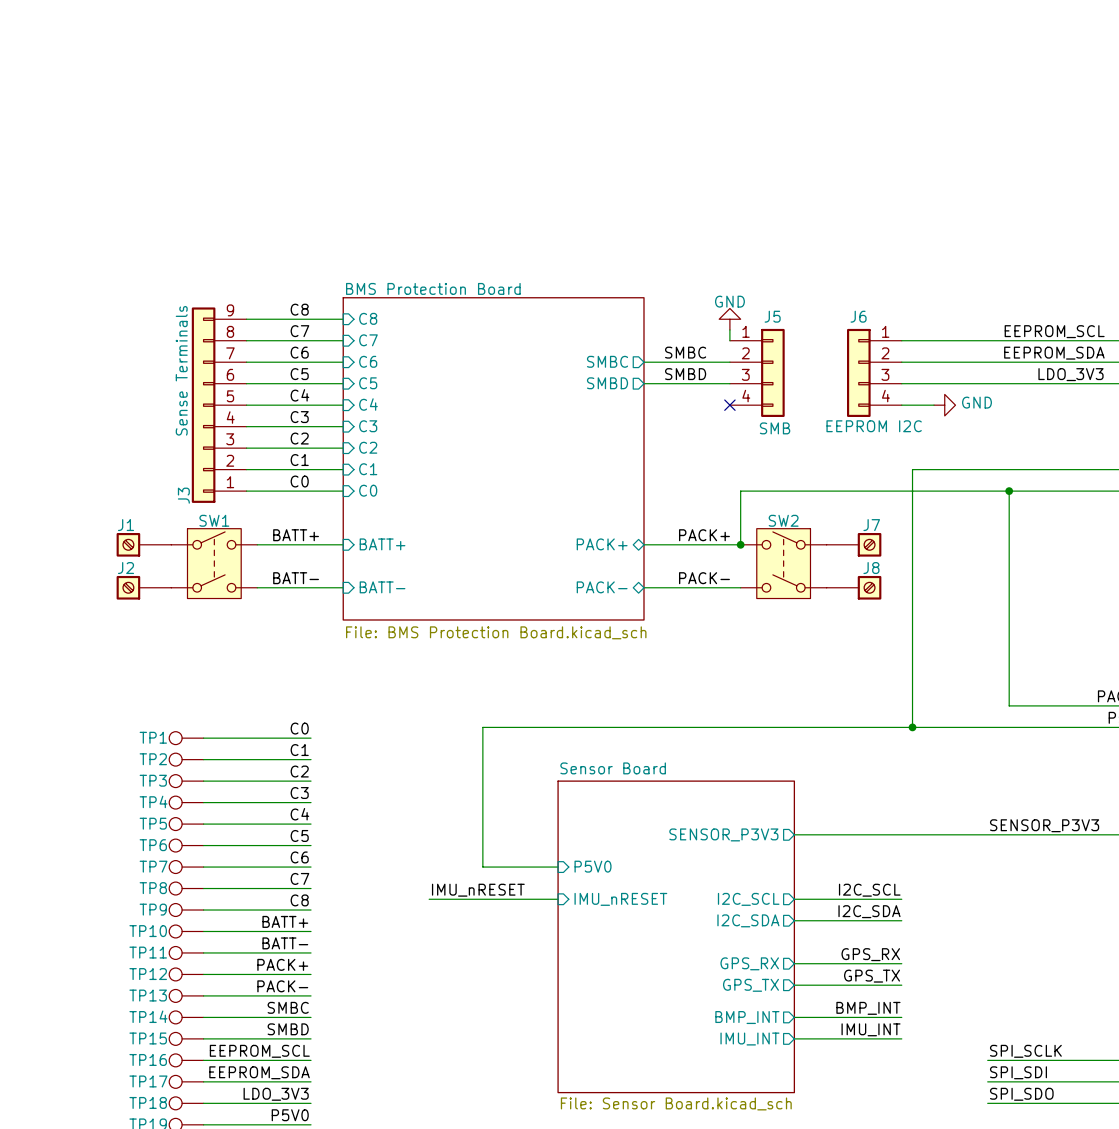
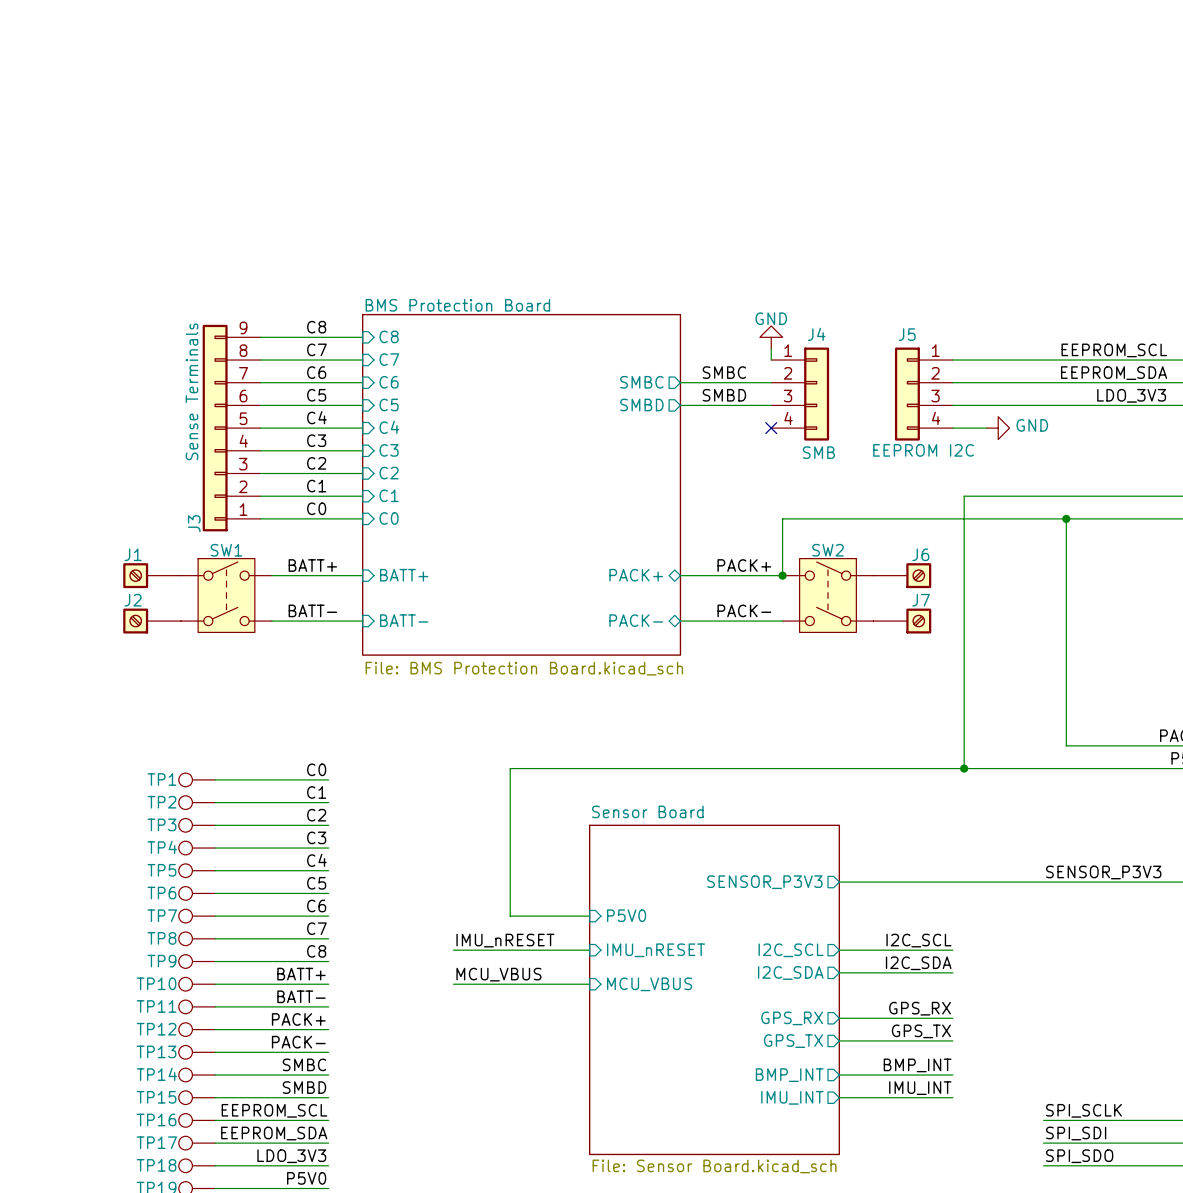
J5 name: J5 (772, 316) -> J4 (816, 334)
J6 name: J6 (858, 316) -> J5 (907, 334)
J7 name: J7 (871, 525) -> J6 (920, 554)
J8 name: J8 (871, 568) -> J7 (921, 600)
label: none -> MCU_VBUS (498, 974)
wire: none -> (453, 984) (589, 984)
sheet pin: none -> MCU_VBUS (649, 984)

